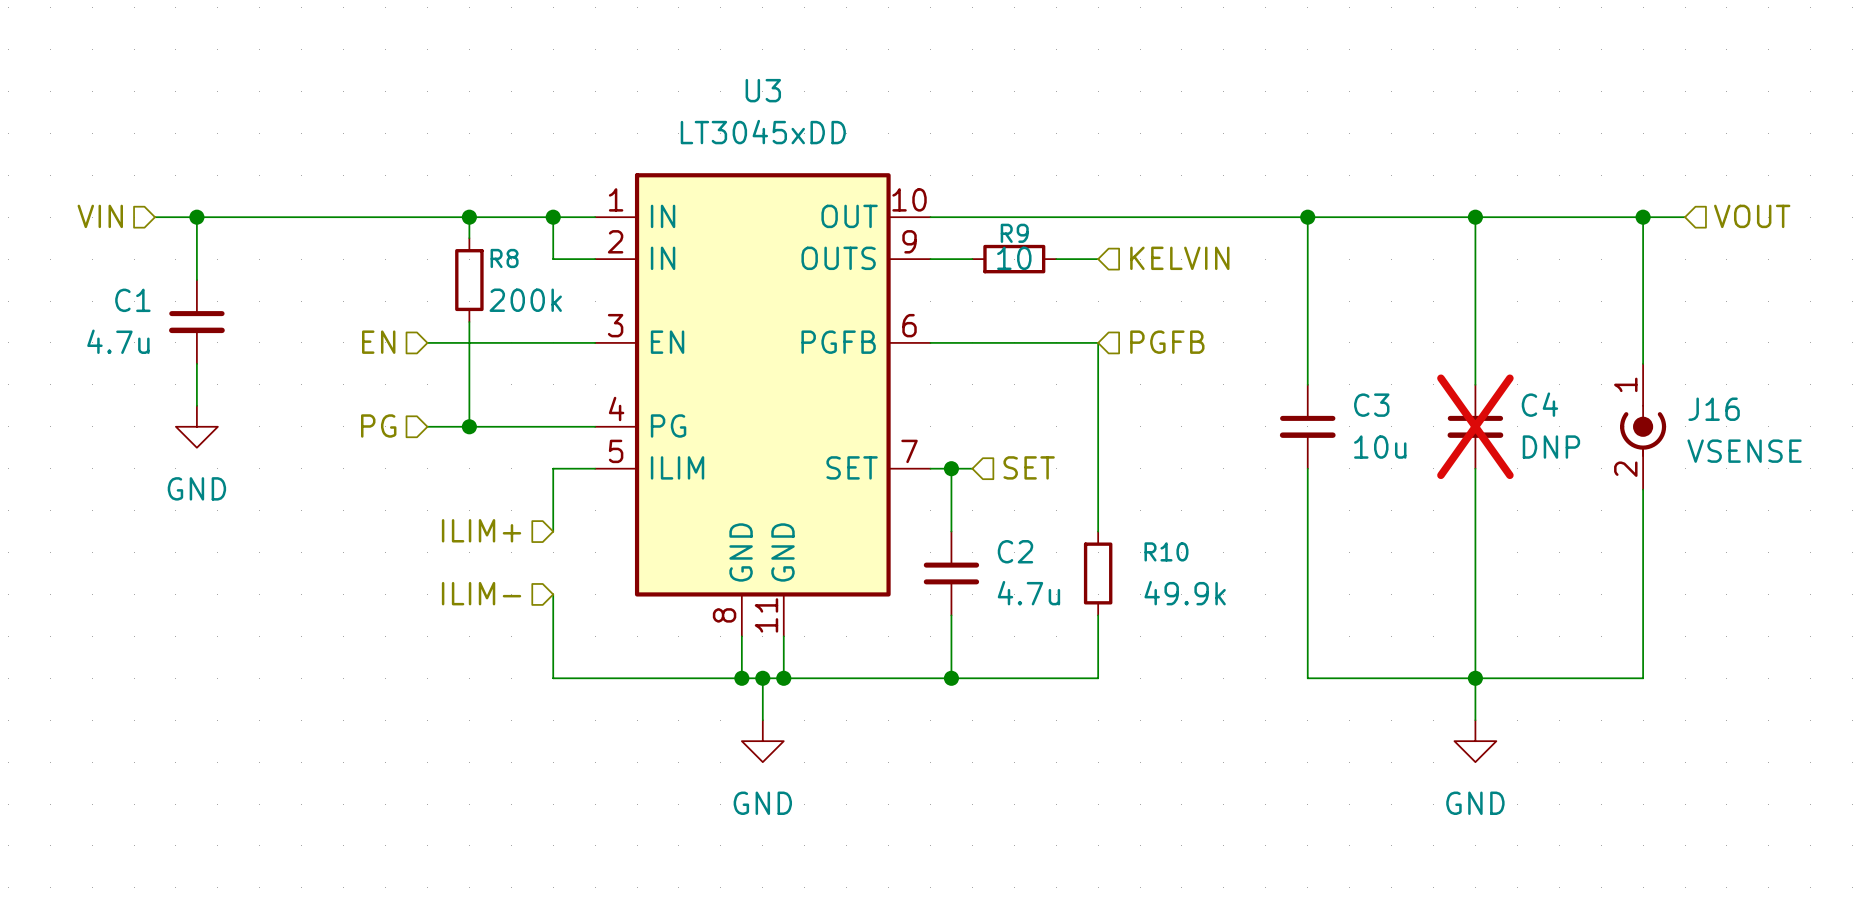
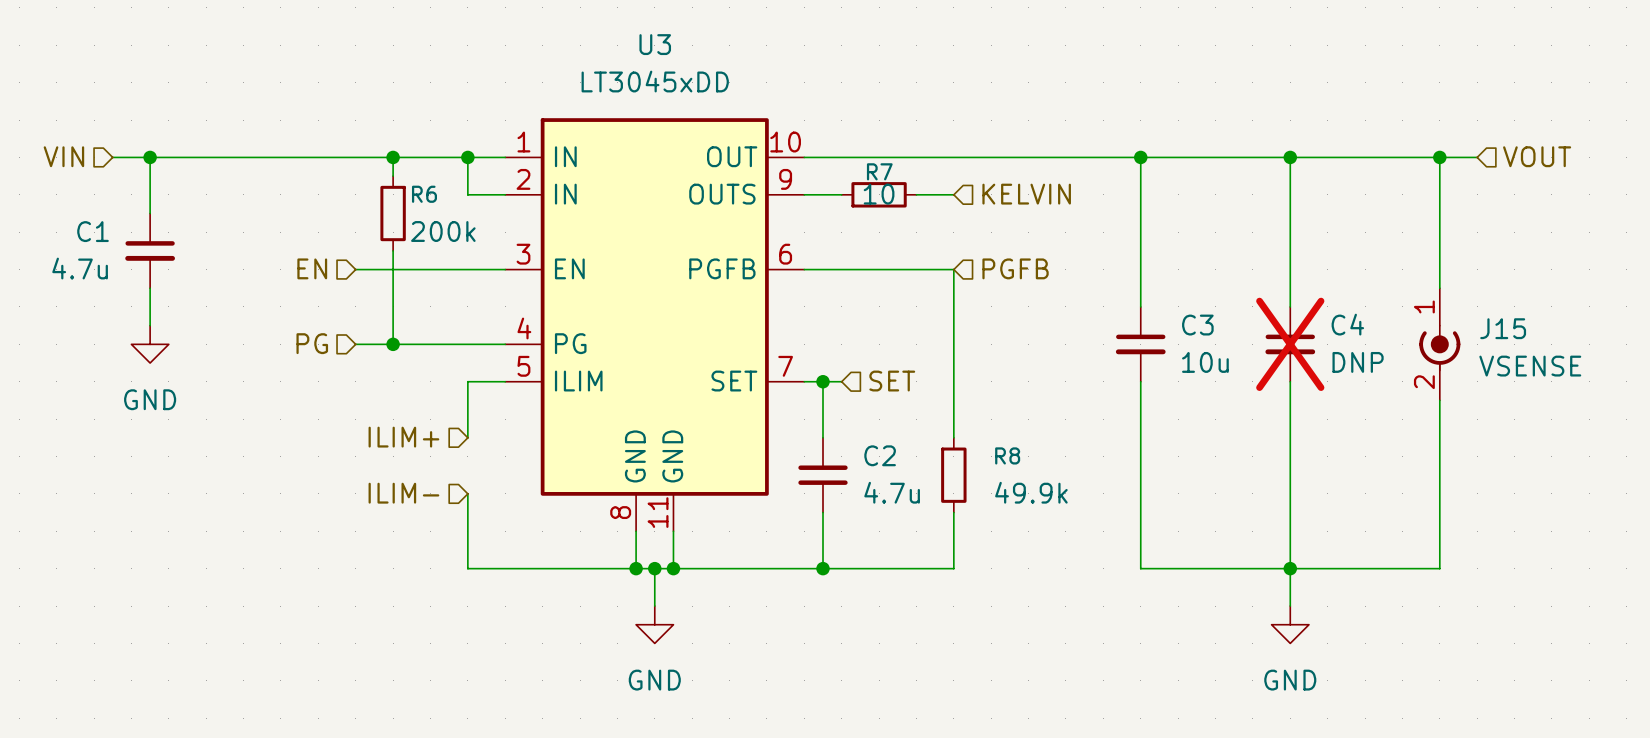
R9 name: R9 (1014, 233) -> R7 (879, 171)
R8 name: R8 (504, 258) -> R6 (424, 194)
J16 name: J16 (1714, 409) -> J15 (1503, 328)
R10 name: R10 (1166, 551) -> R8 (1007, 455)

